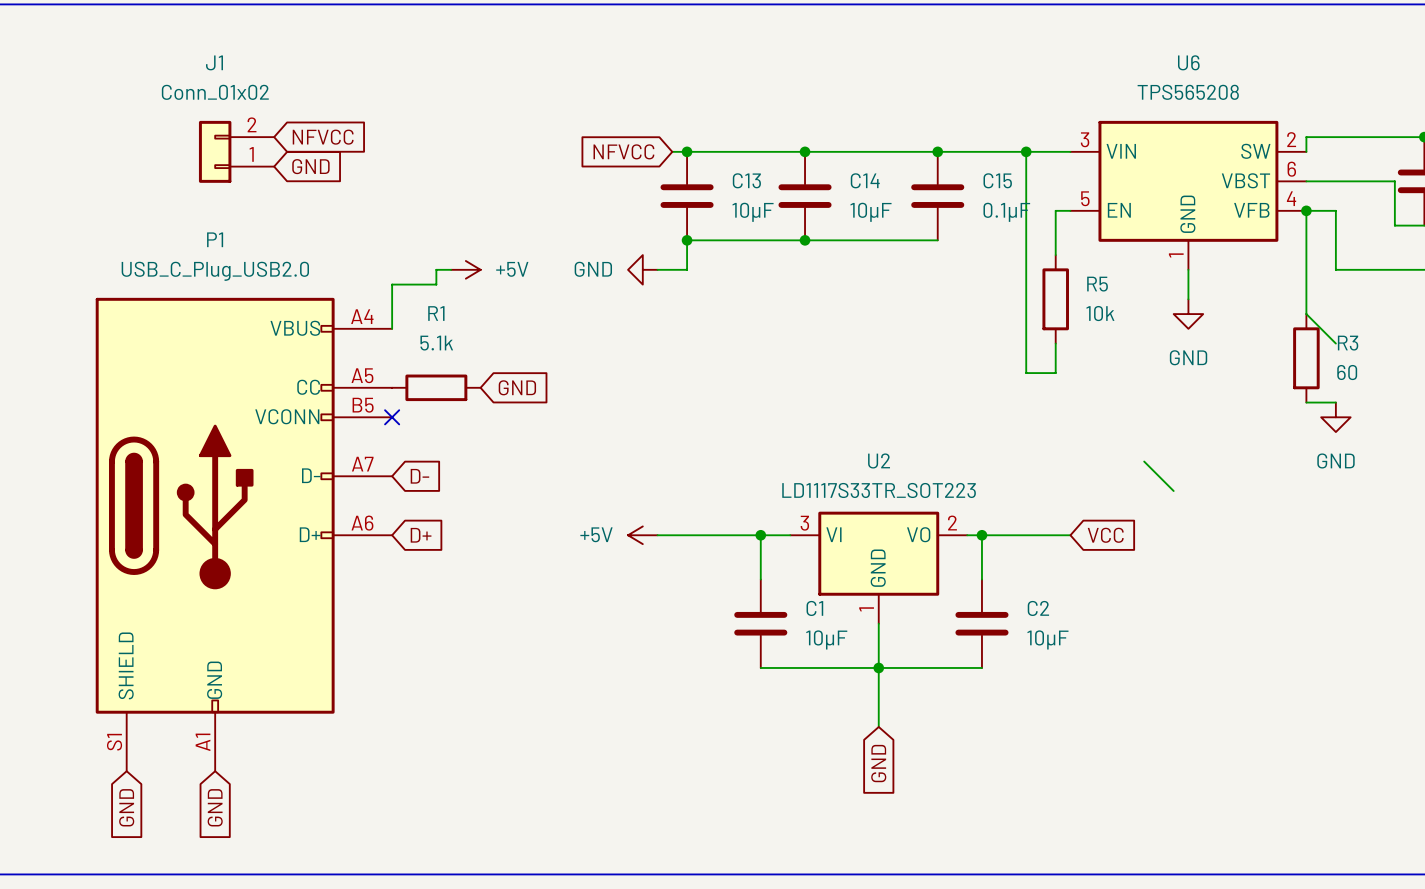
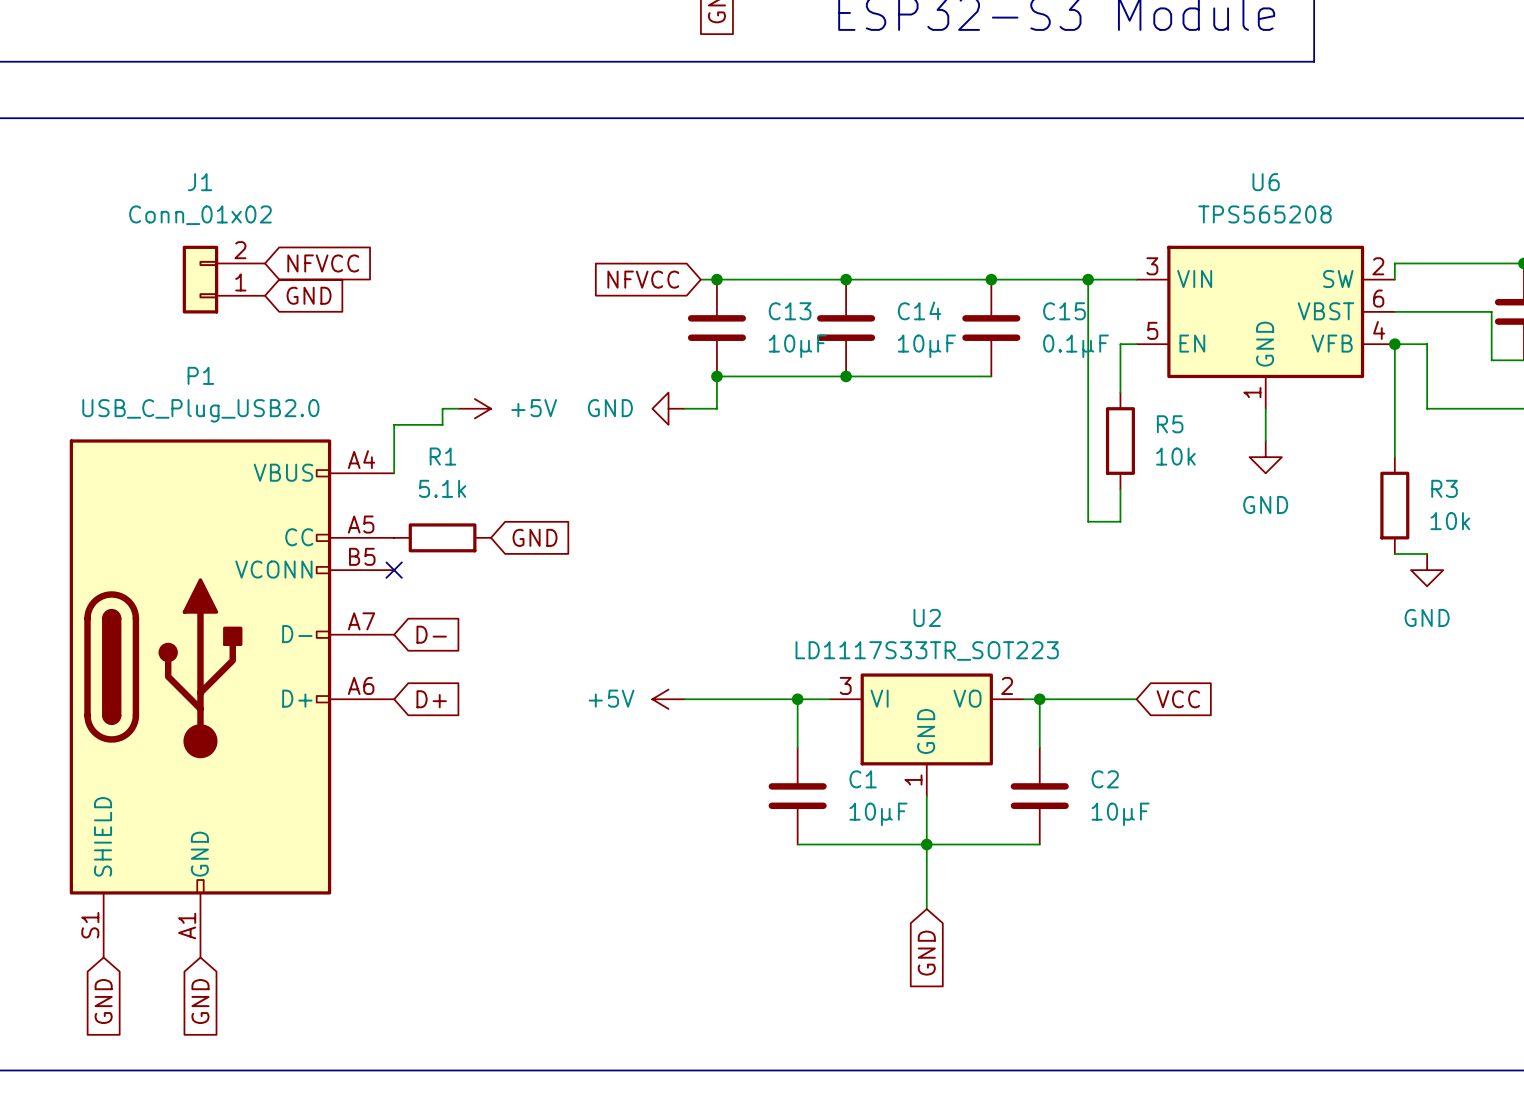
wire: (1306, 314) (1335, 343) -> none
R3 value: 60 (1347, 372) -> 10k (1450, 521)
wire: (1144, 461) (1173, 491) -> none

